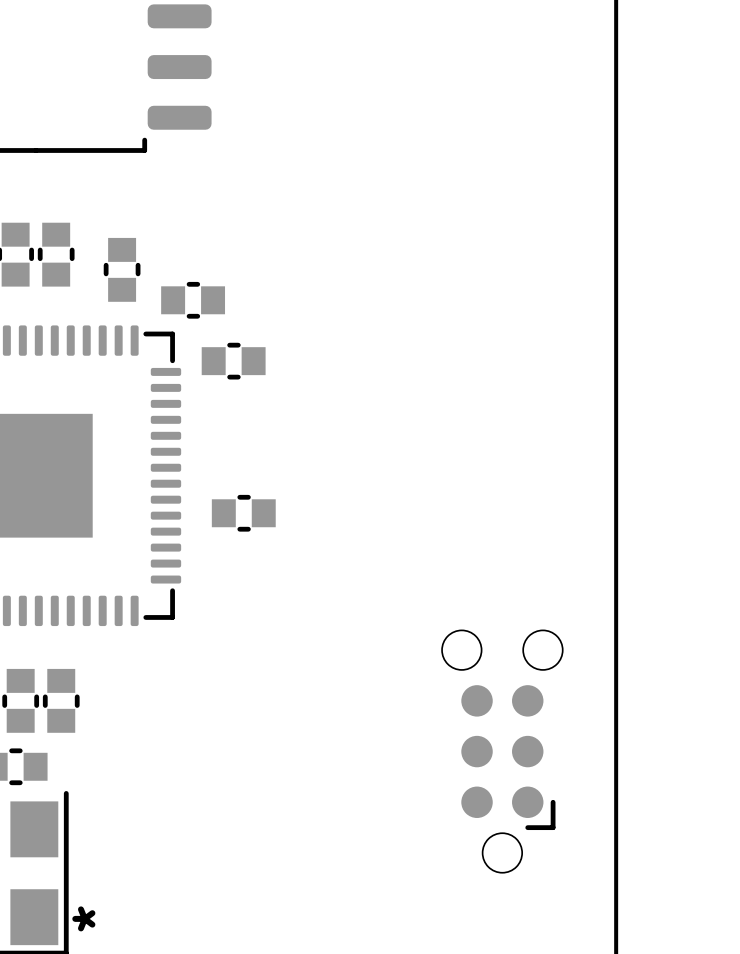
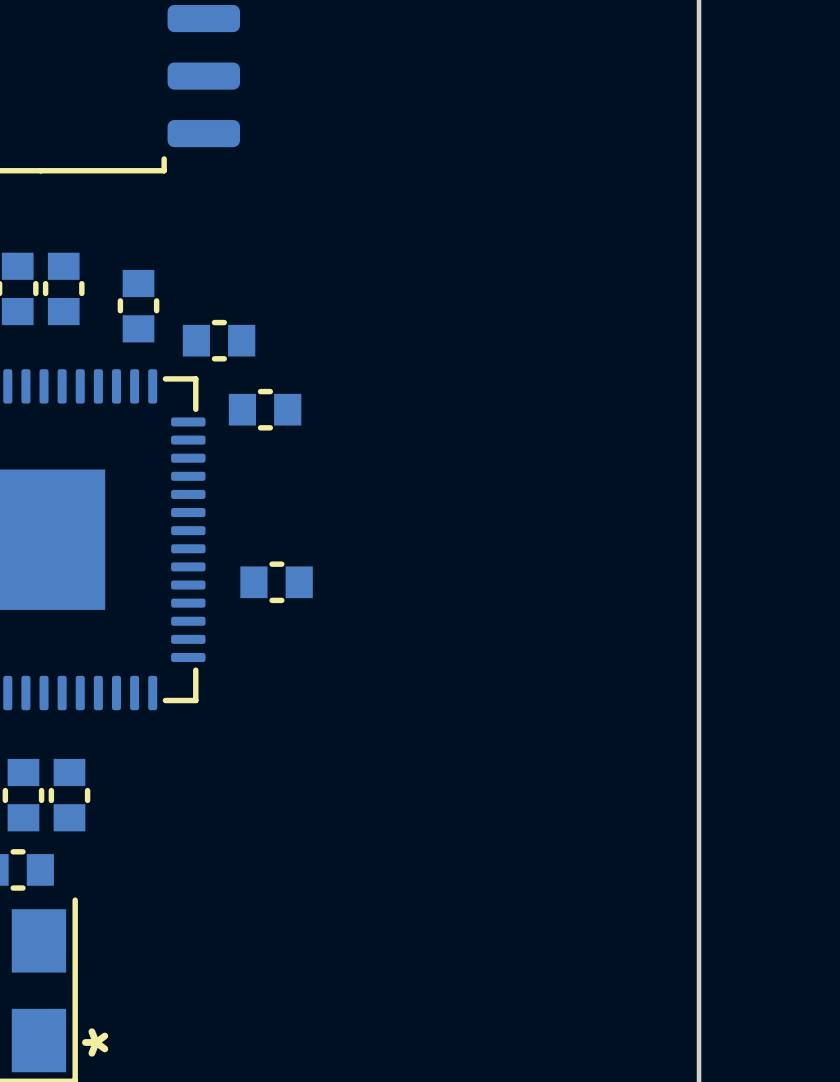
part: (502, 751) -> none

